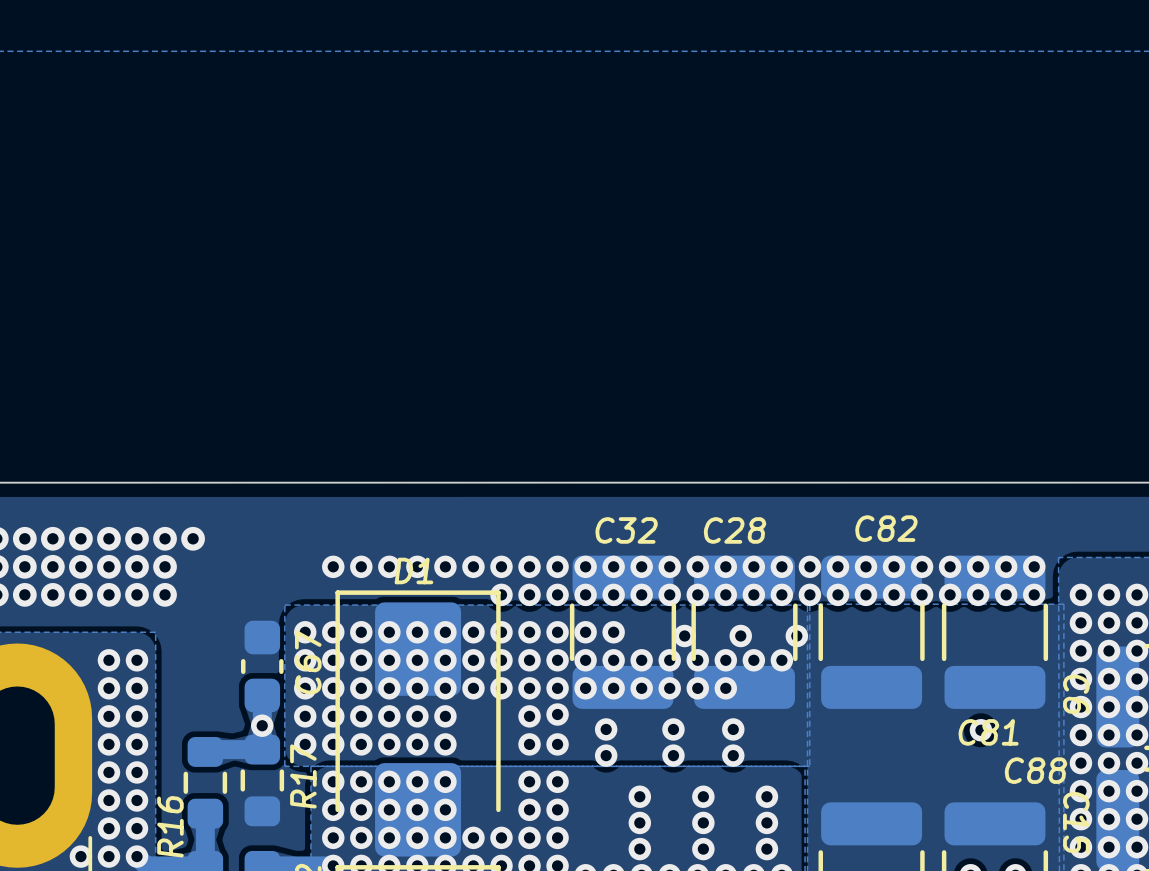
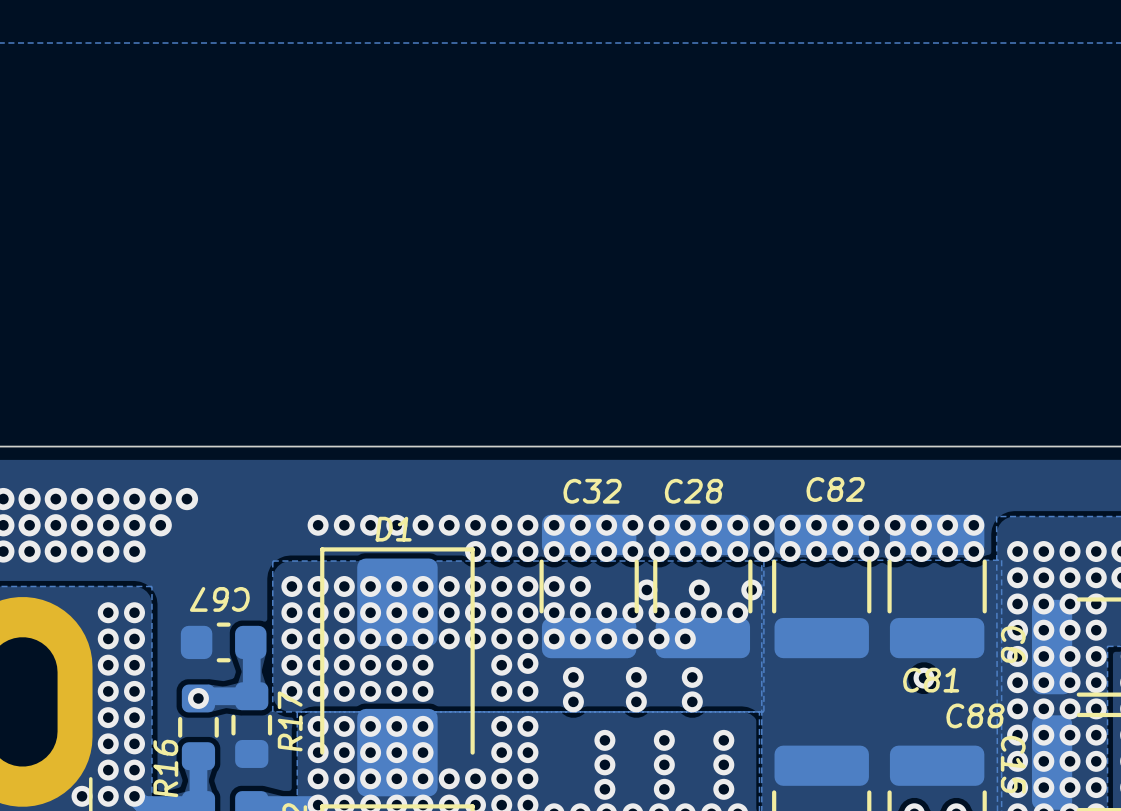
via: (165, 594) -> none
C67 rotation: 0° (262, 666) -> 90° clockwise (223, 642)
via position: (262, 725) -> (198, 698)

